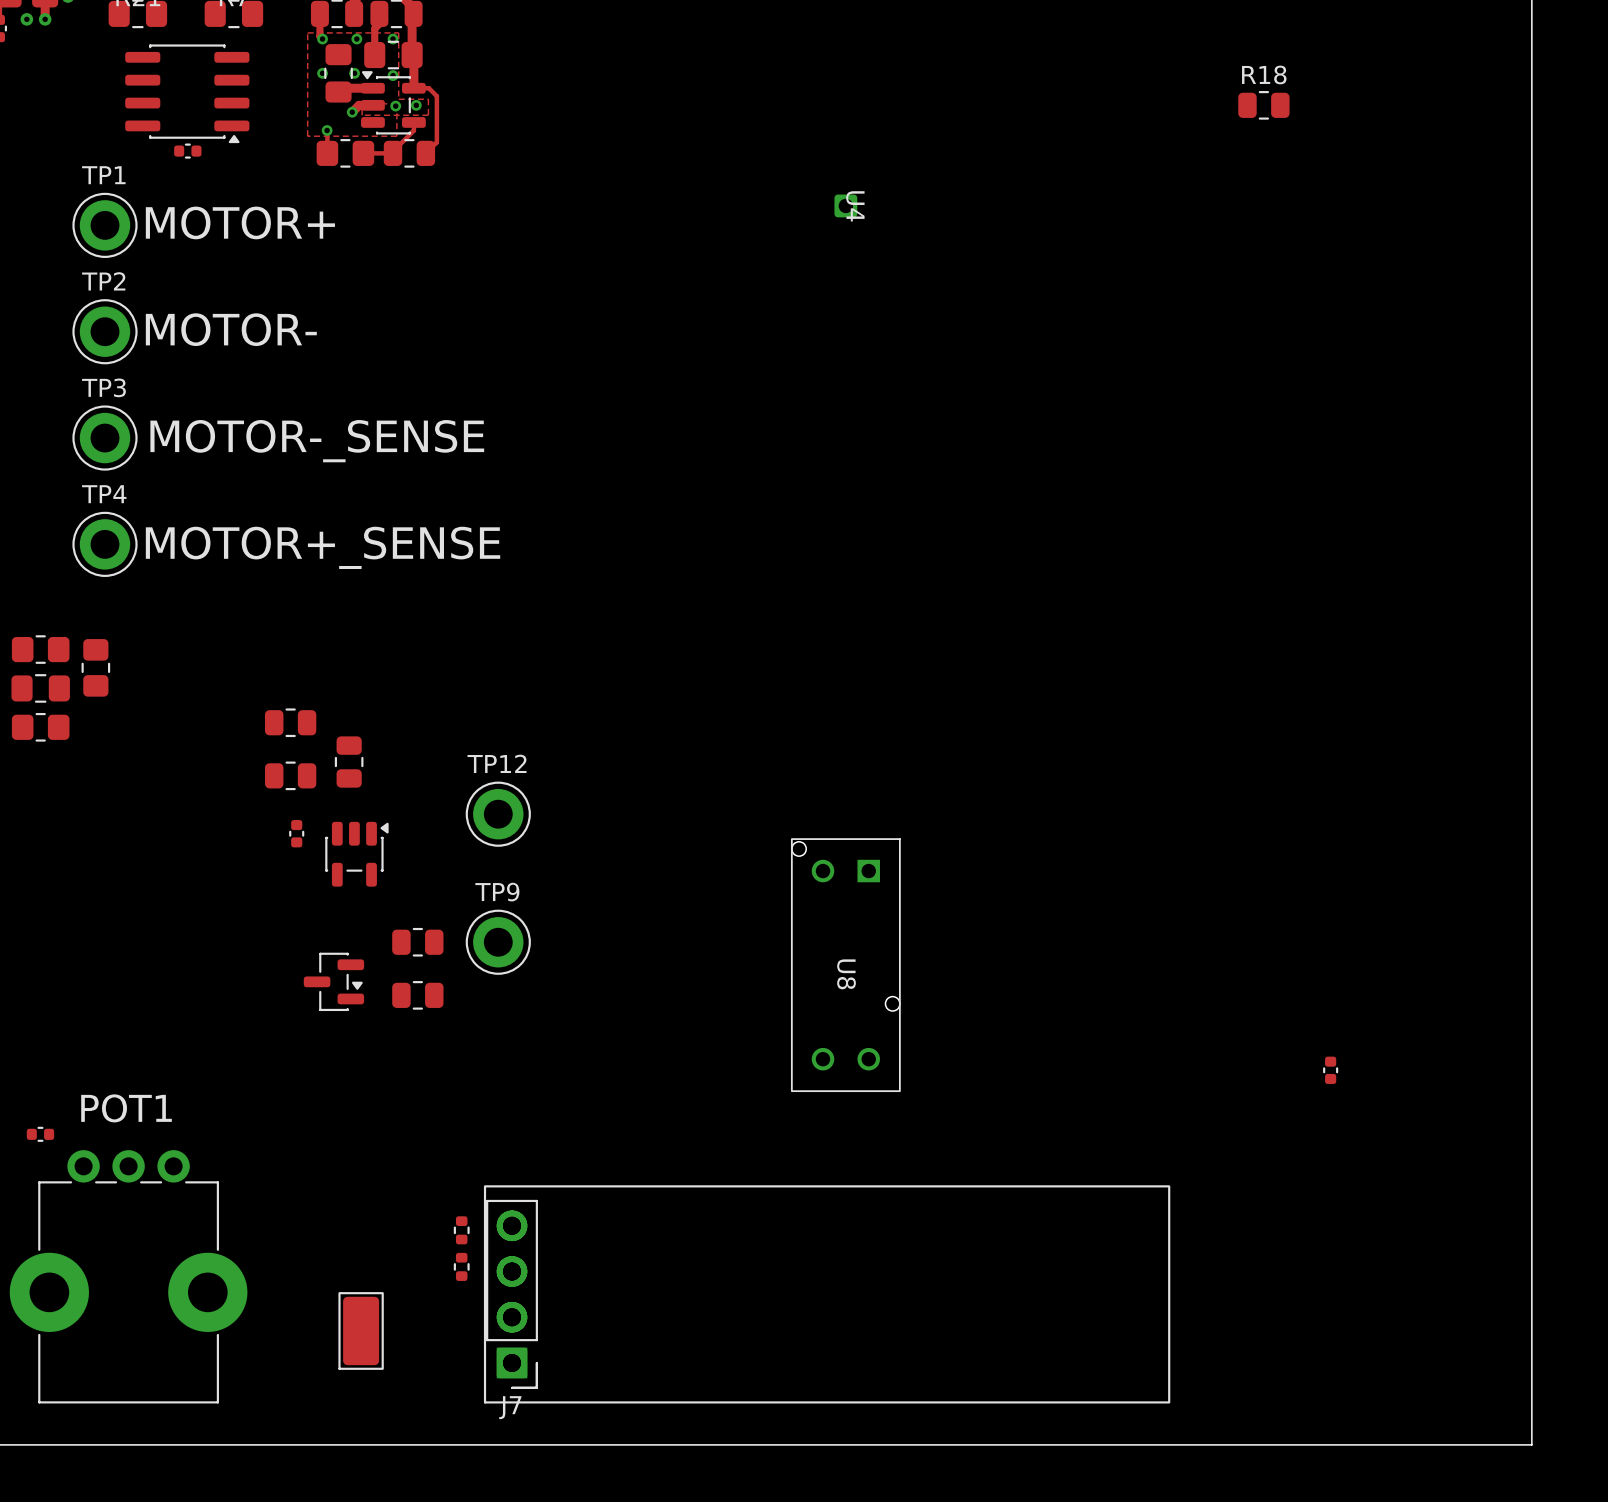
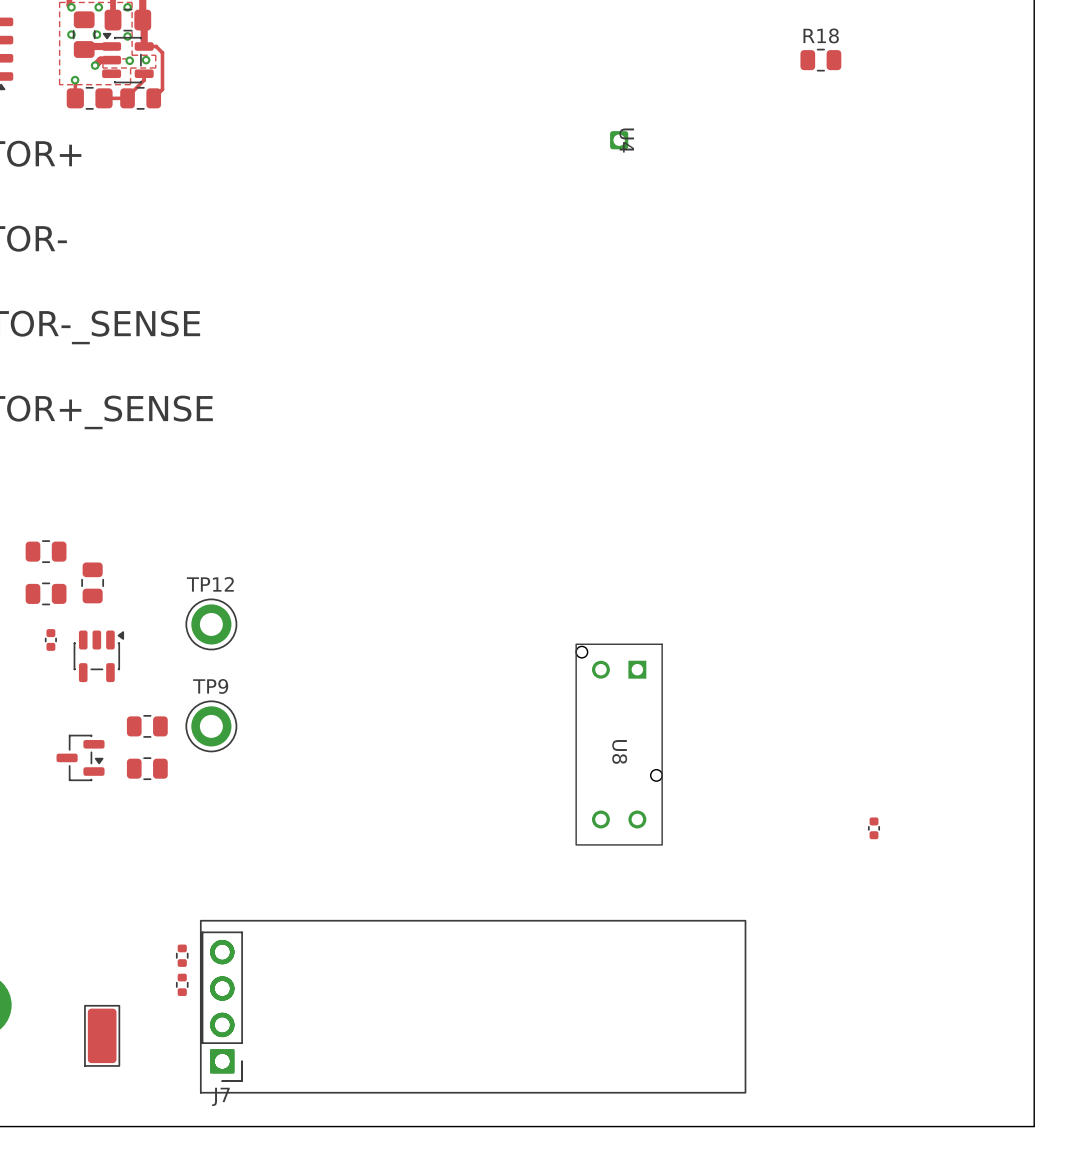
U4 position: (845, 205) -> (619, 140)
U8 position: (845, 965) -> (619, 744)

